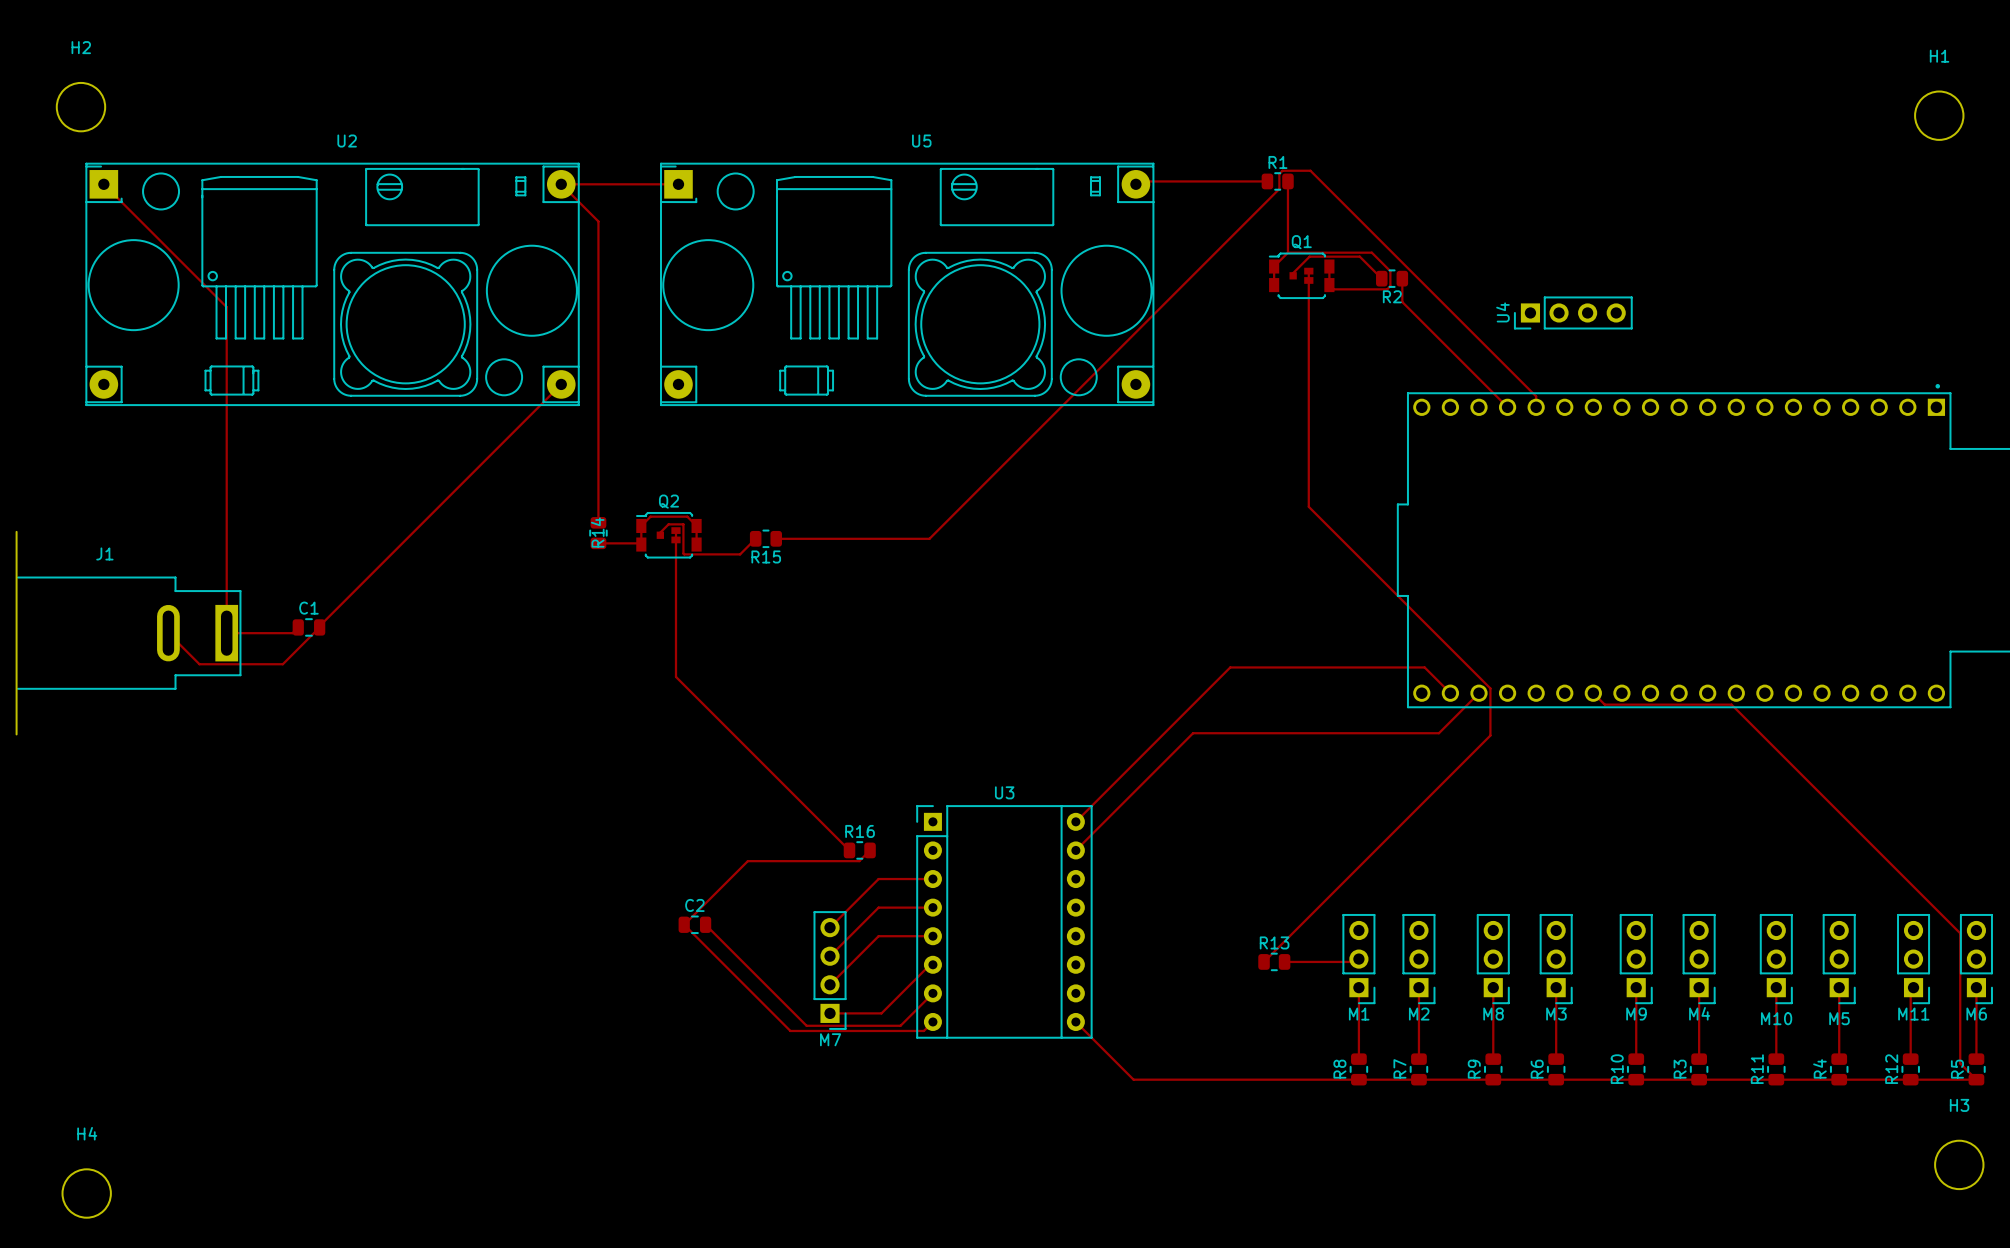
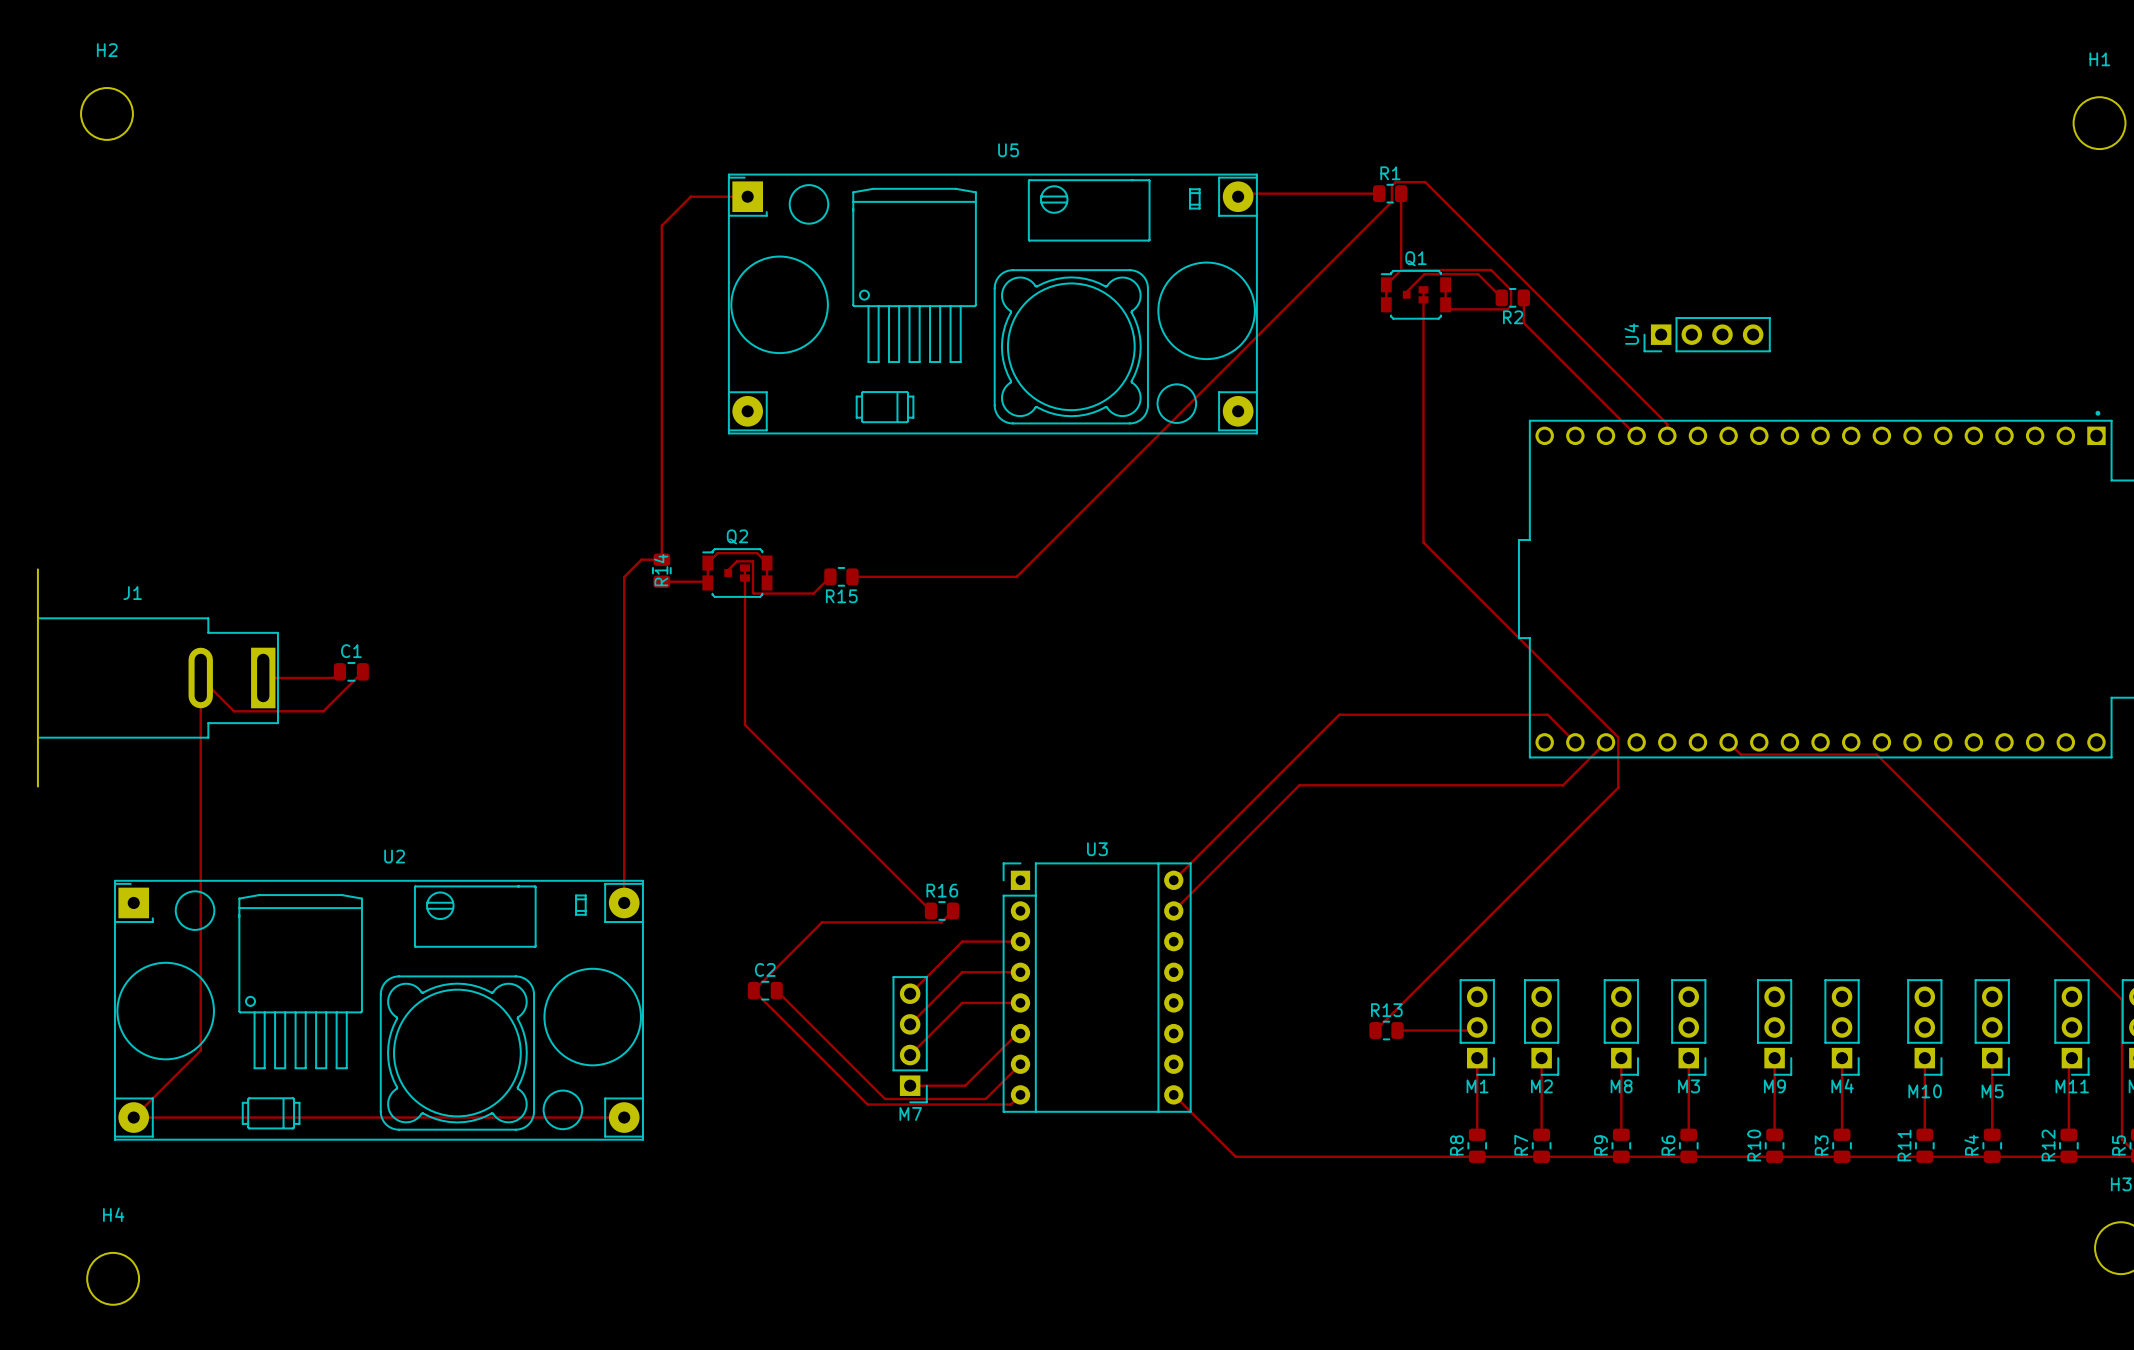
track: (103, 184) (226, 307) (226, 633) -> none
track: (625, 184) (561, 184) (598, 221) -> (690, 196) (661, 225) (661, 236)
U2 position: (332, 284) -> (379, 1010)
track: (561, 384) (319, 626) -> none
track: none -> (661, 559) (641, 559) (624, 577) (624, 902)
track: none -> (200, 677) (200, 1050) (133, 1117) (624, 1117)

